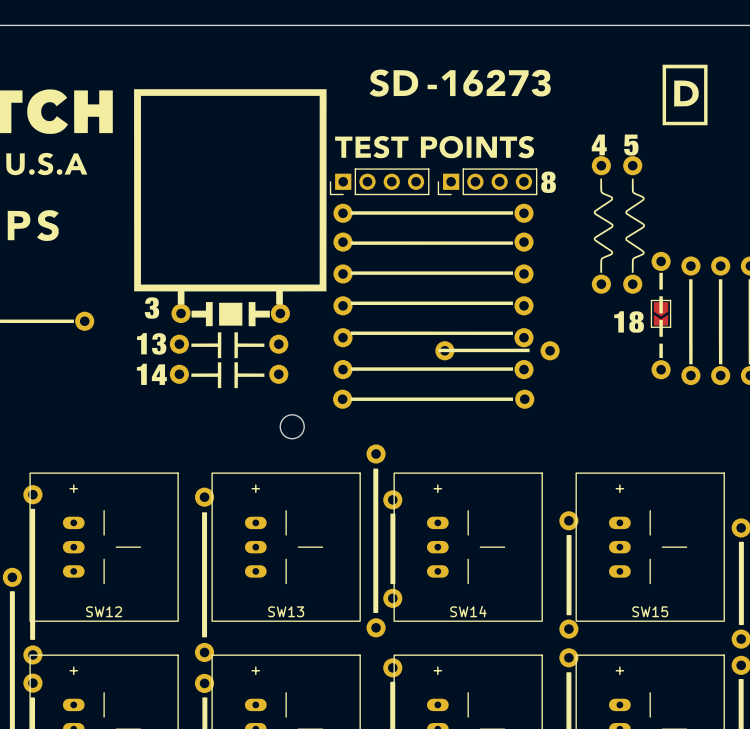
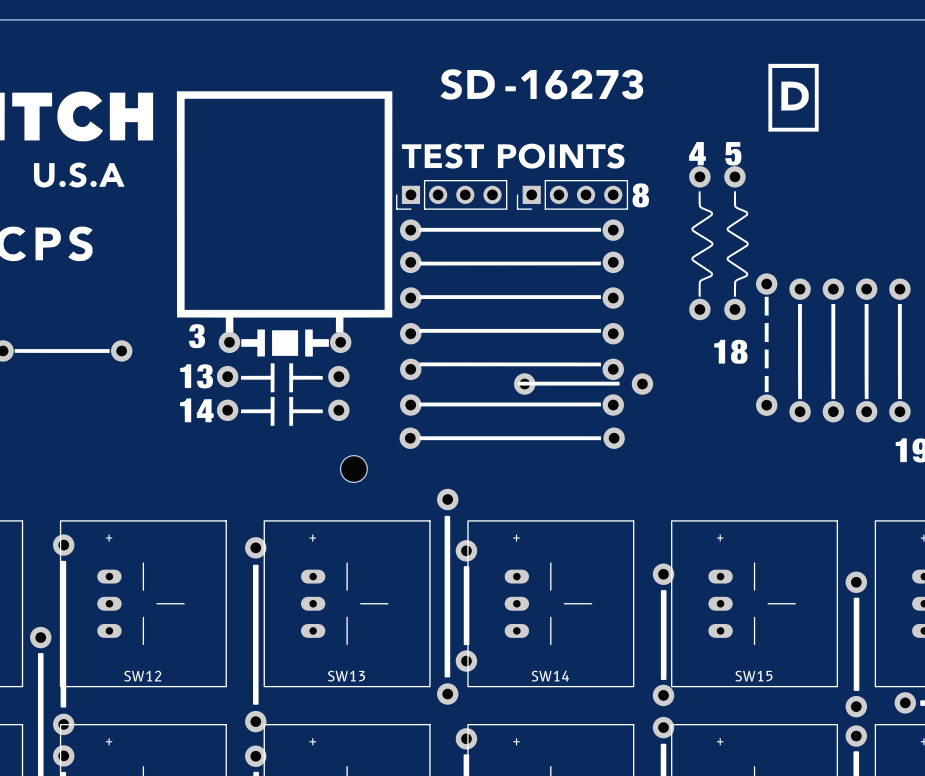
part: (661, 313) -> none

